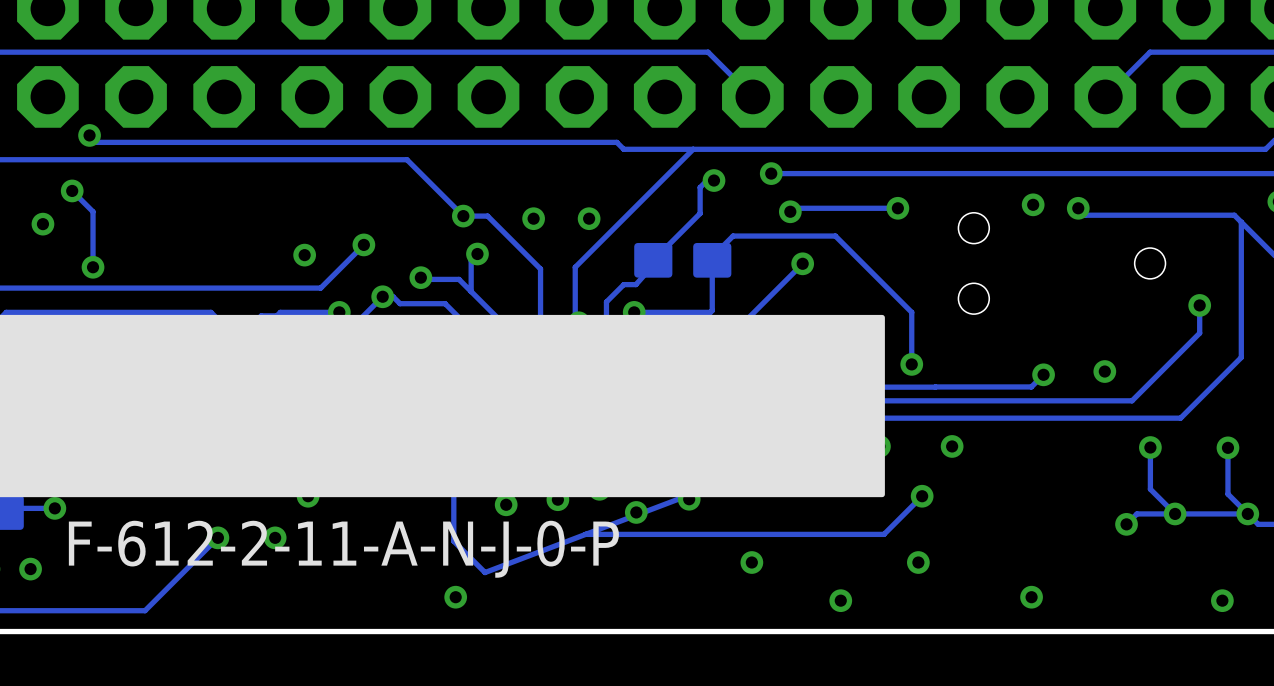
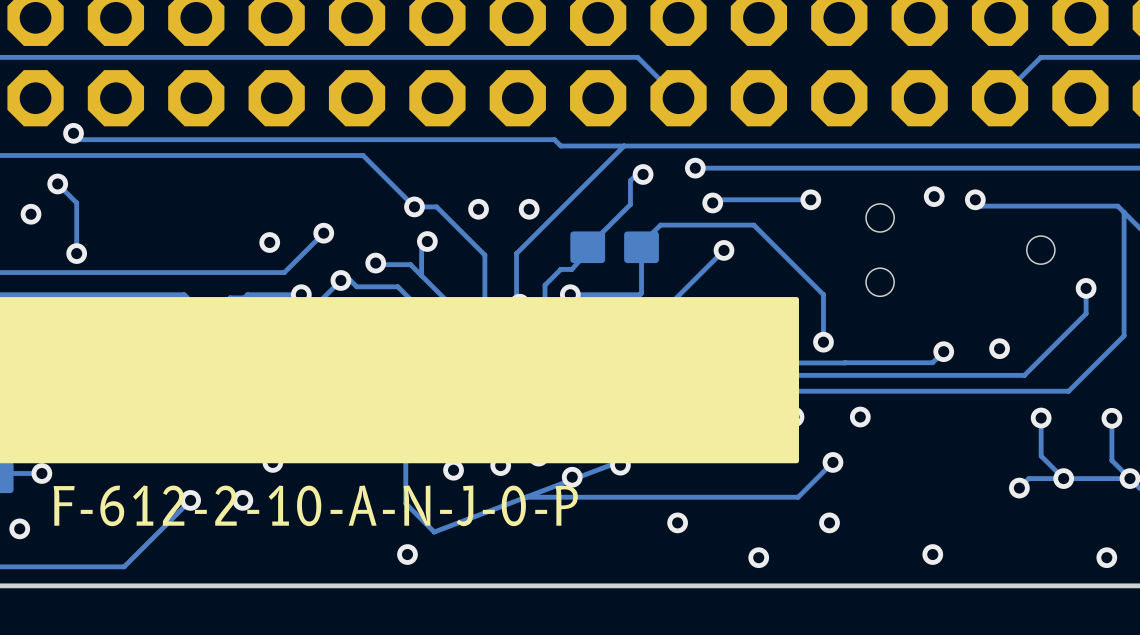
text: F-612-2-11-A-N-J-0-P (343, 549) -> F-612-2-10-A-N-J-0-P (315, 505)

